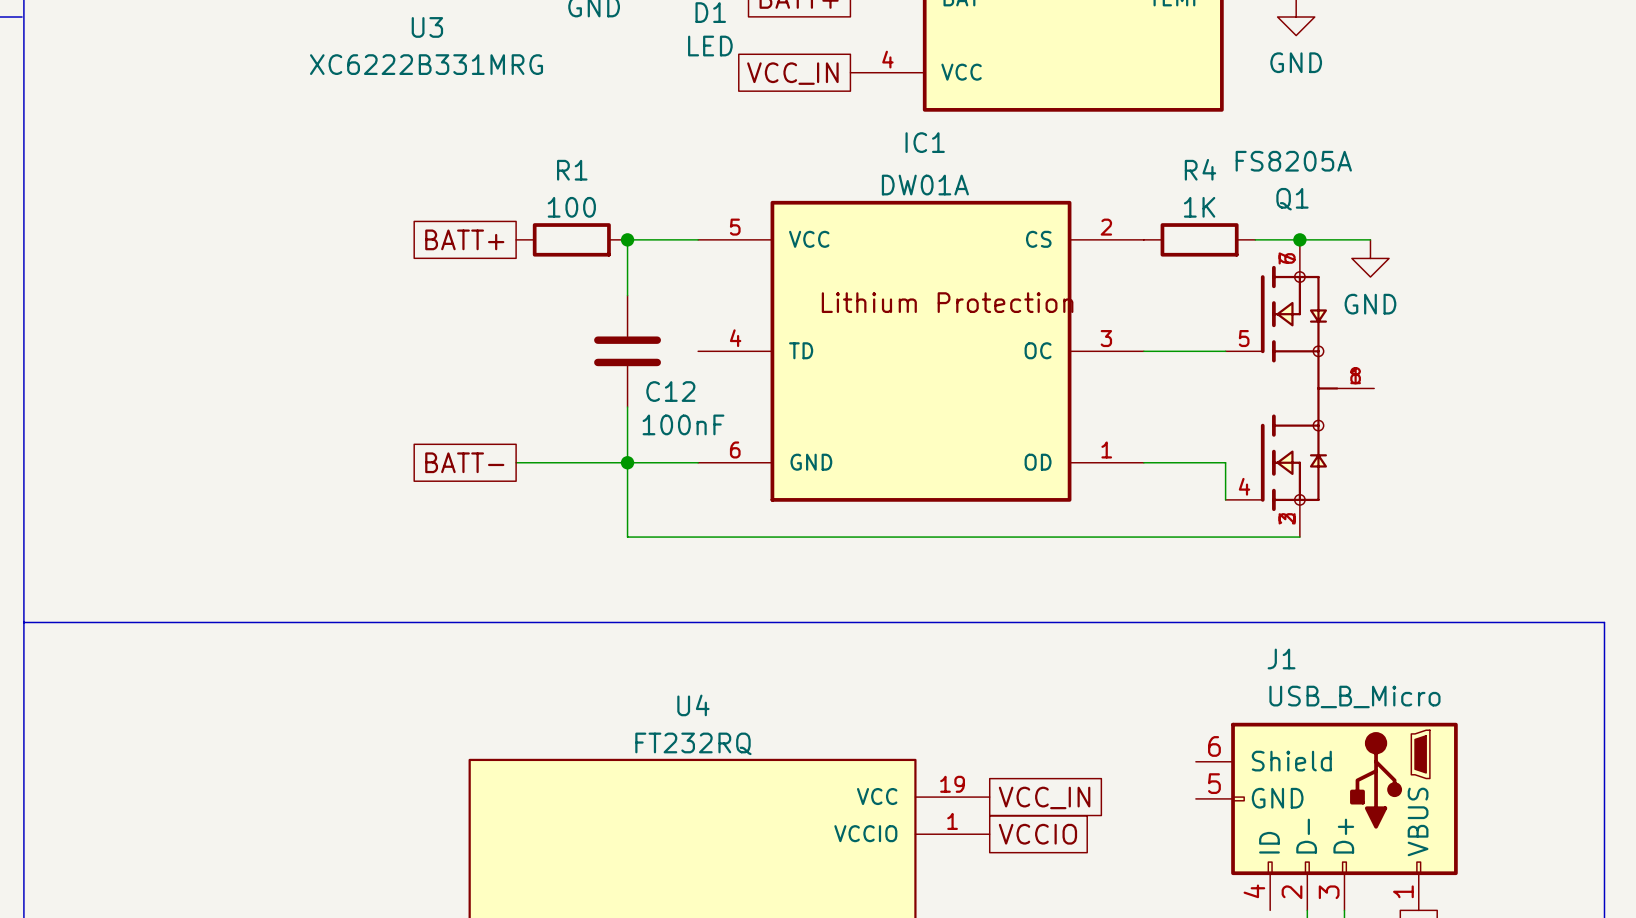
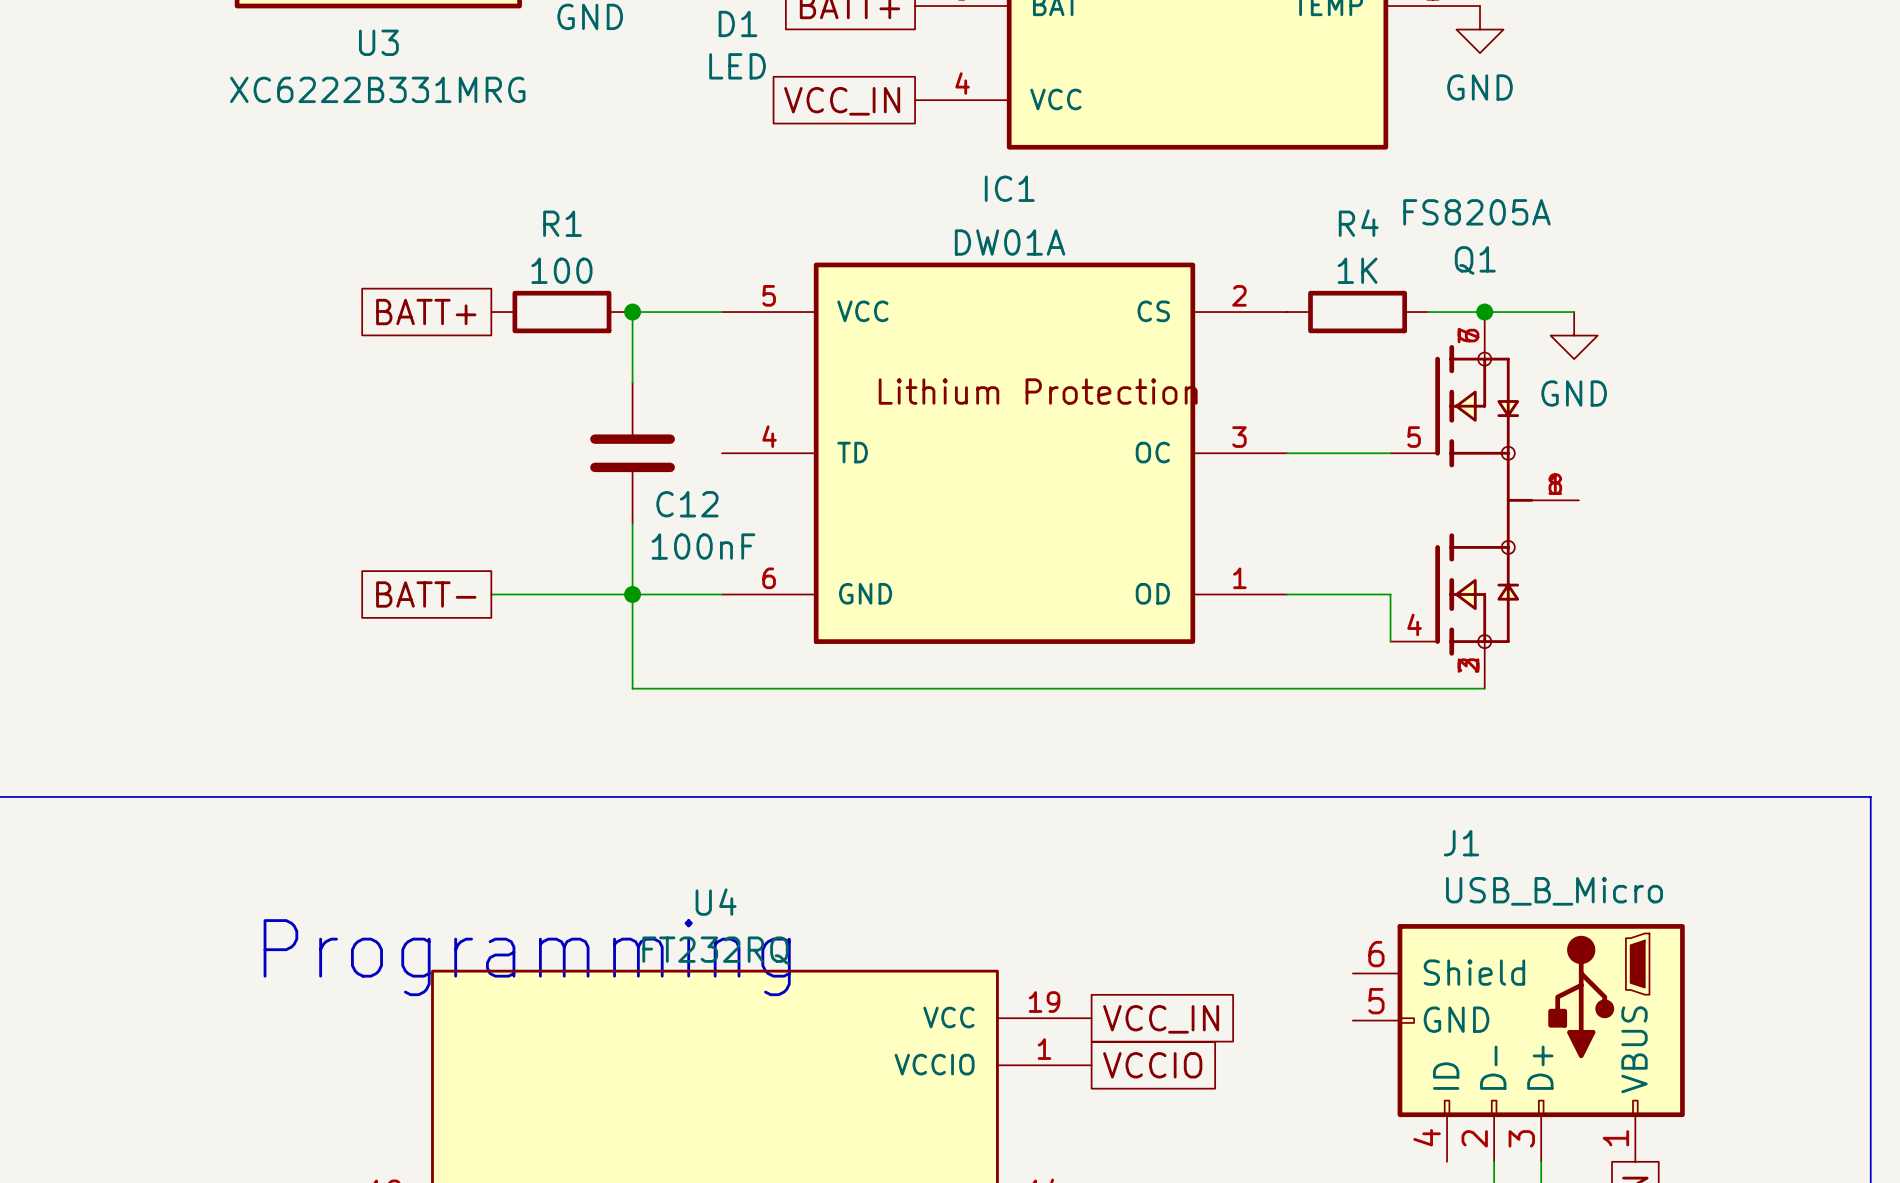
text: none -> Programming (527, 957)

